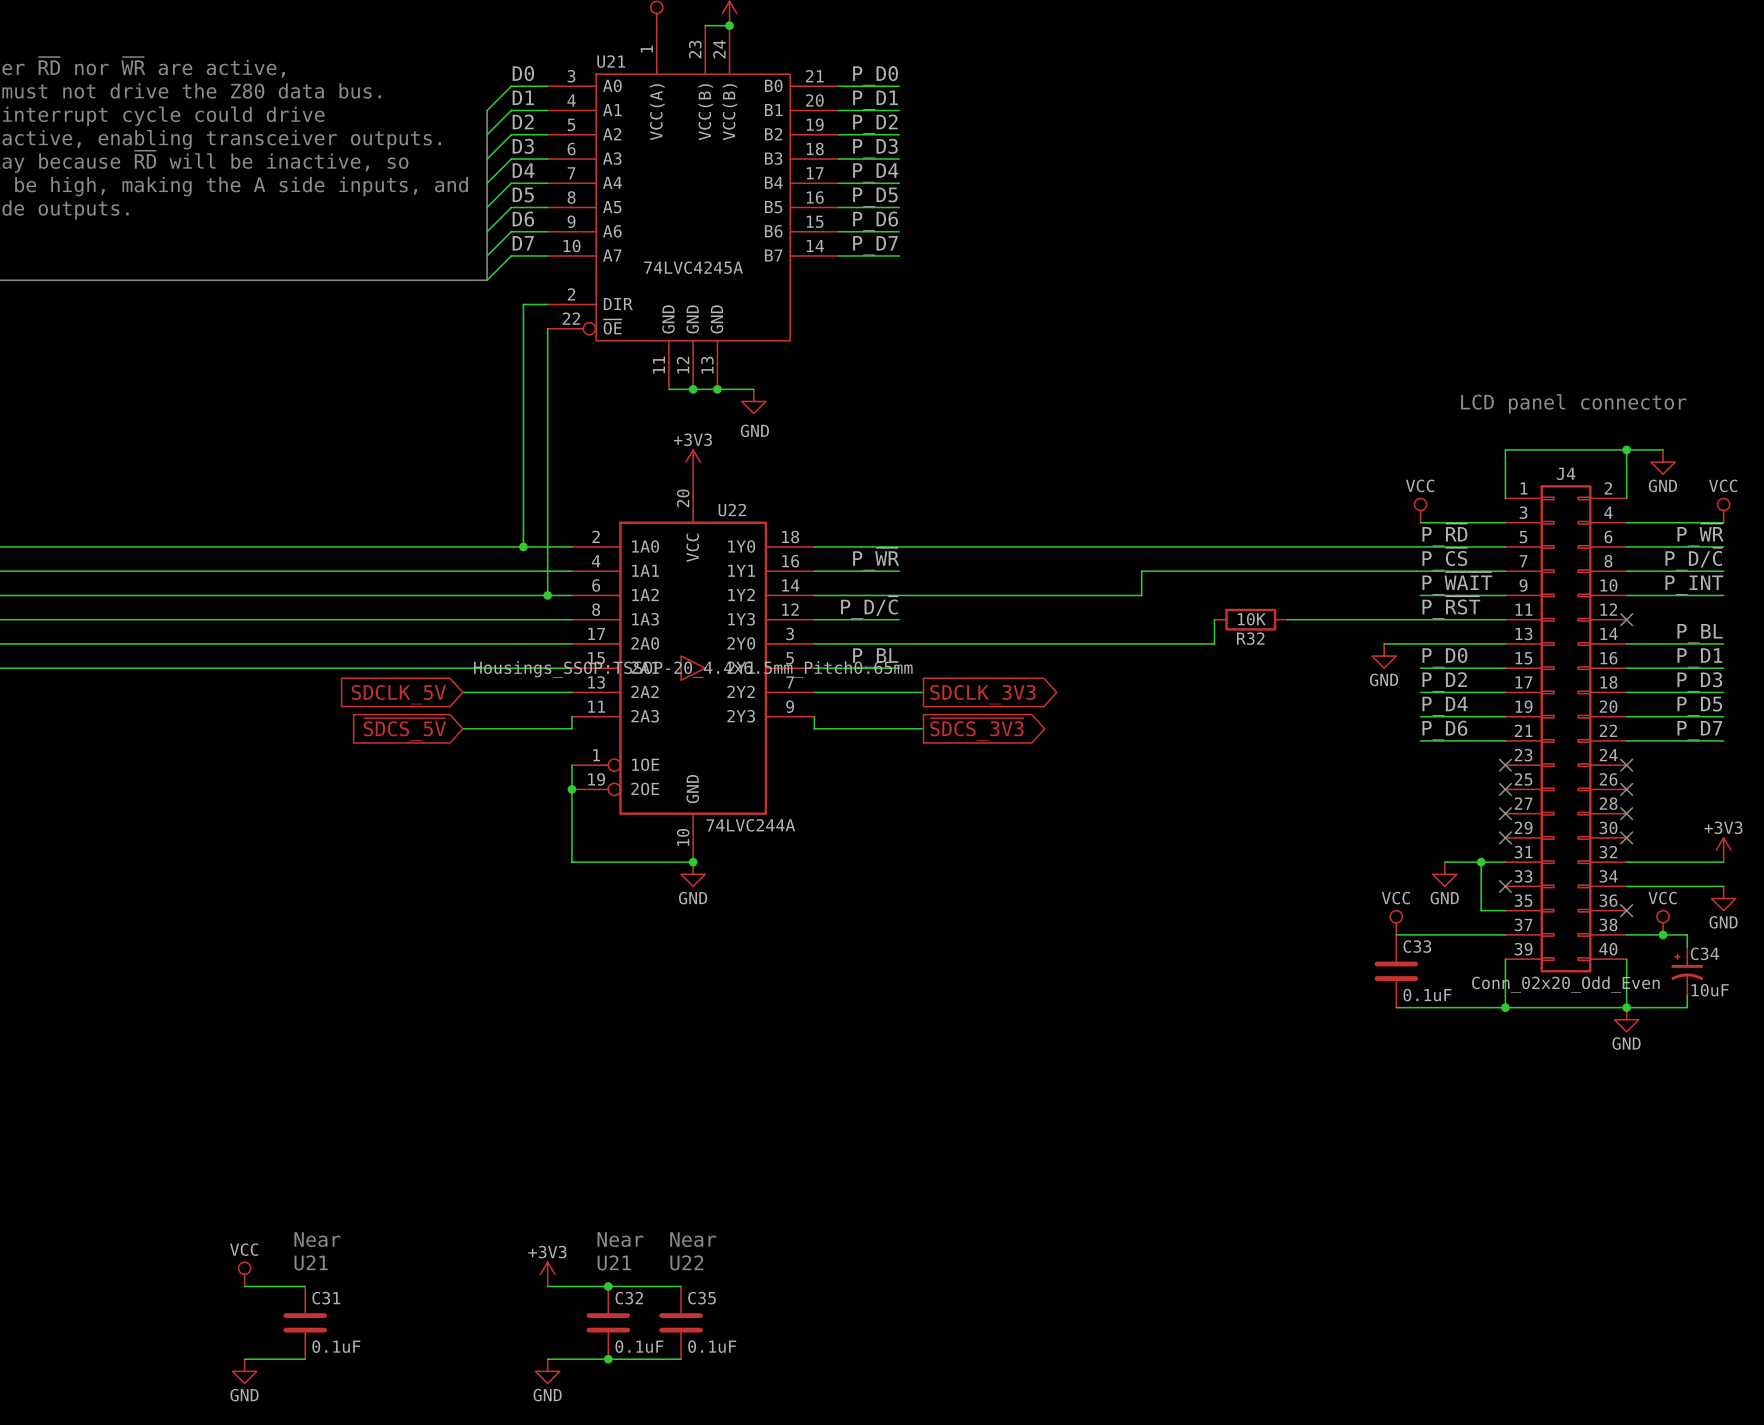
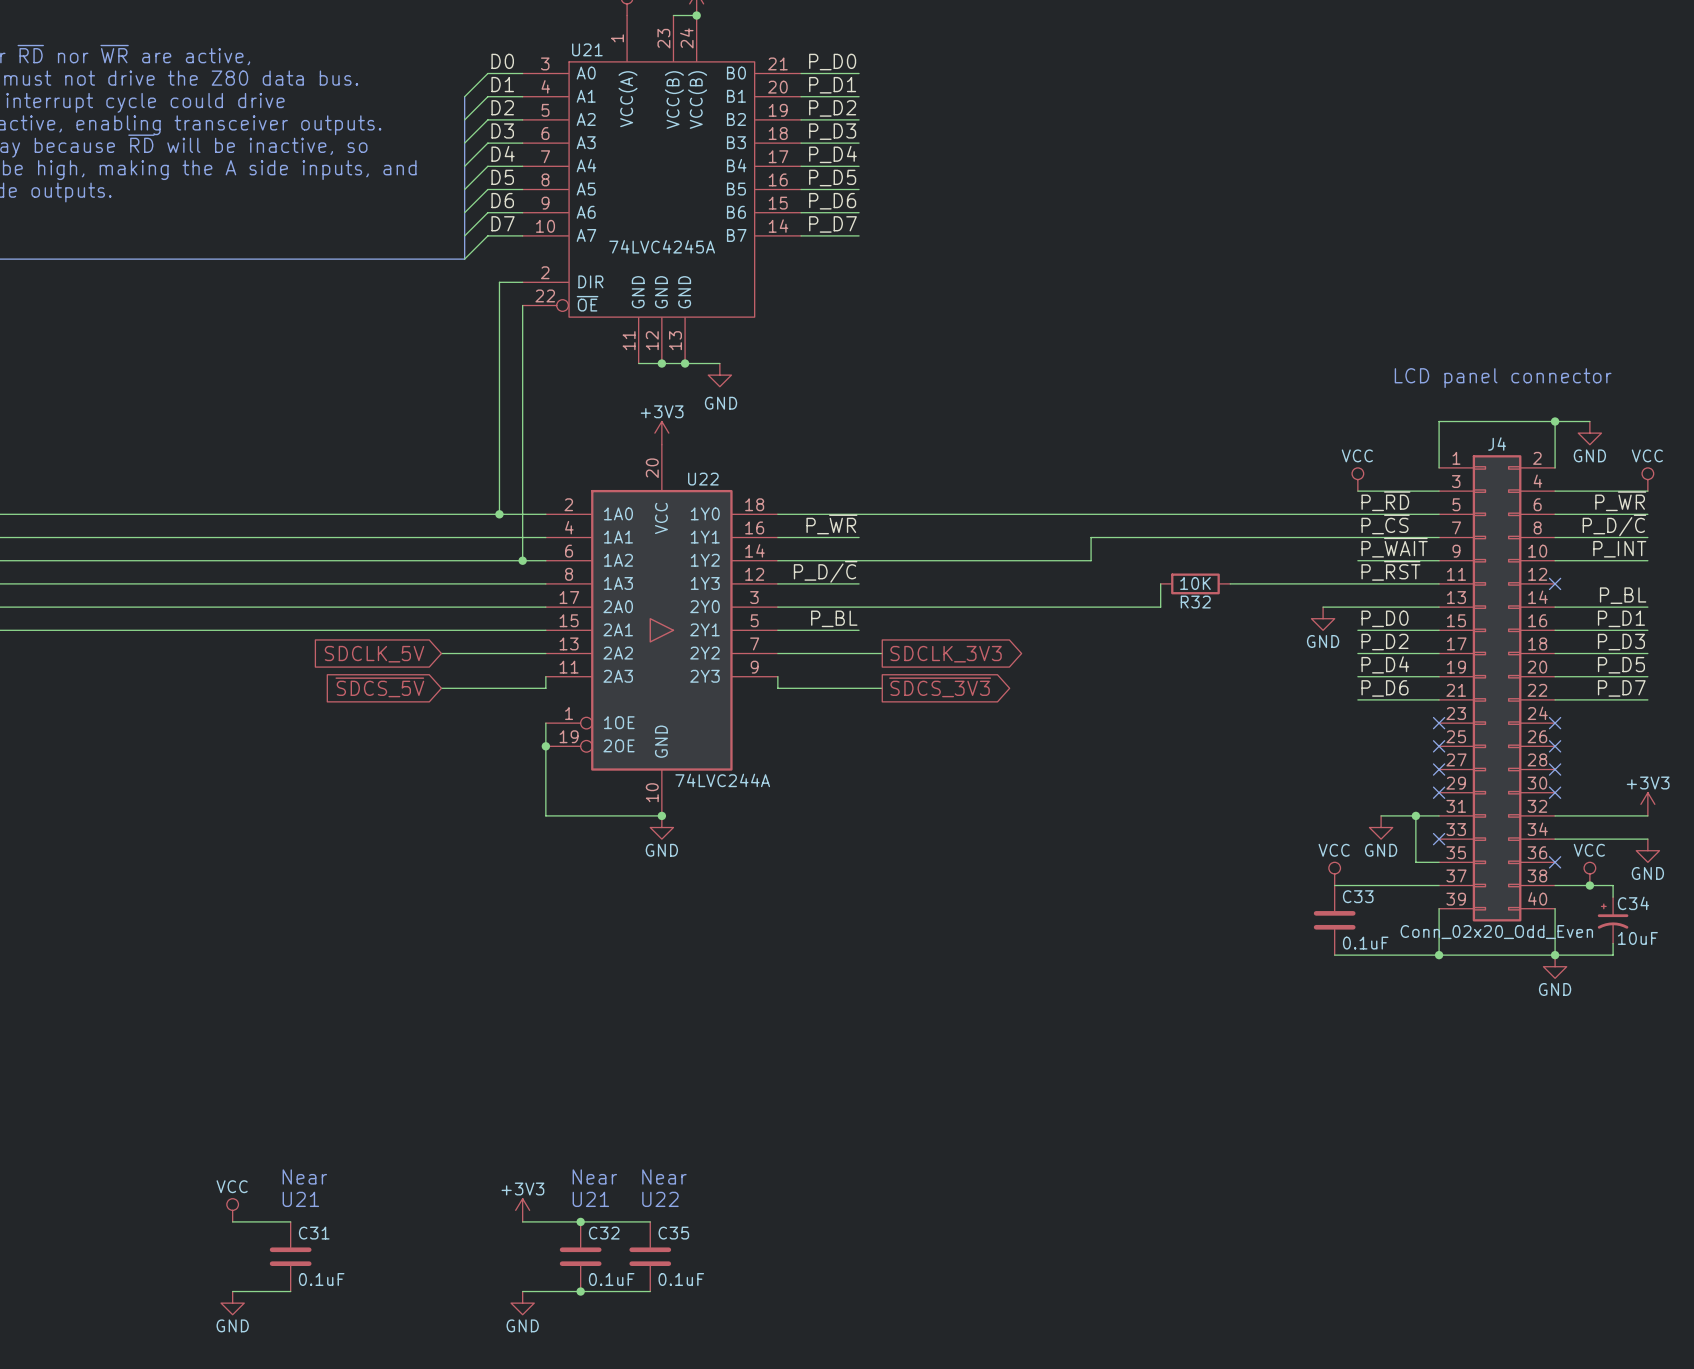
U22 text: Housings_SSOP:TSSOP-20_4.4x6.5mm_Pitch0.65mm (693, 669) -> none

